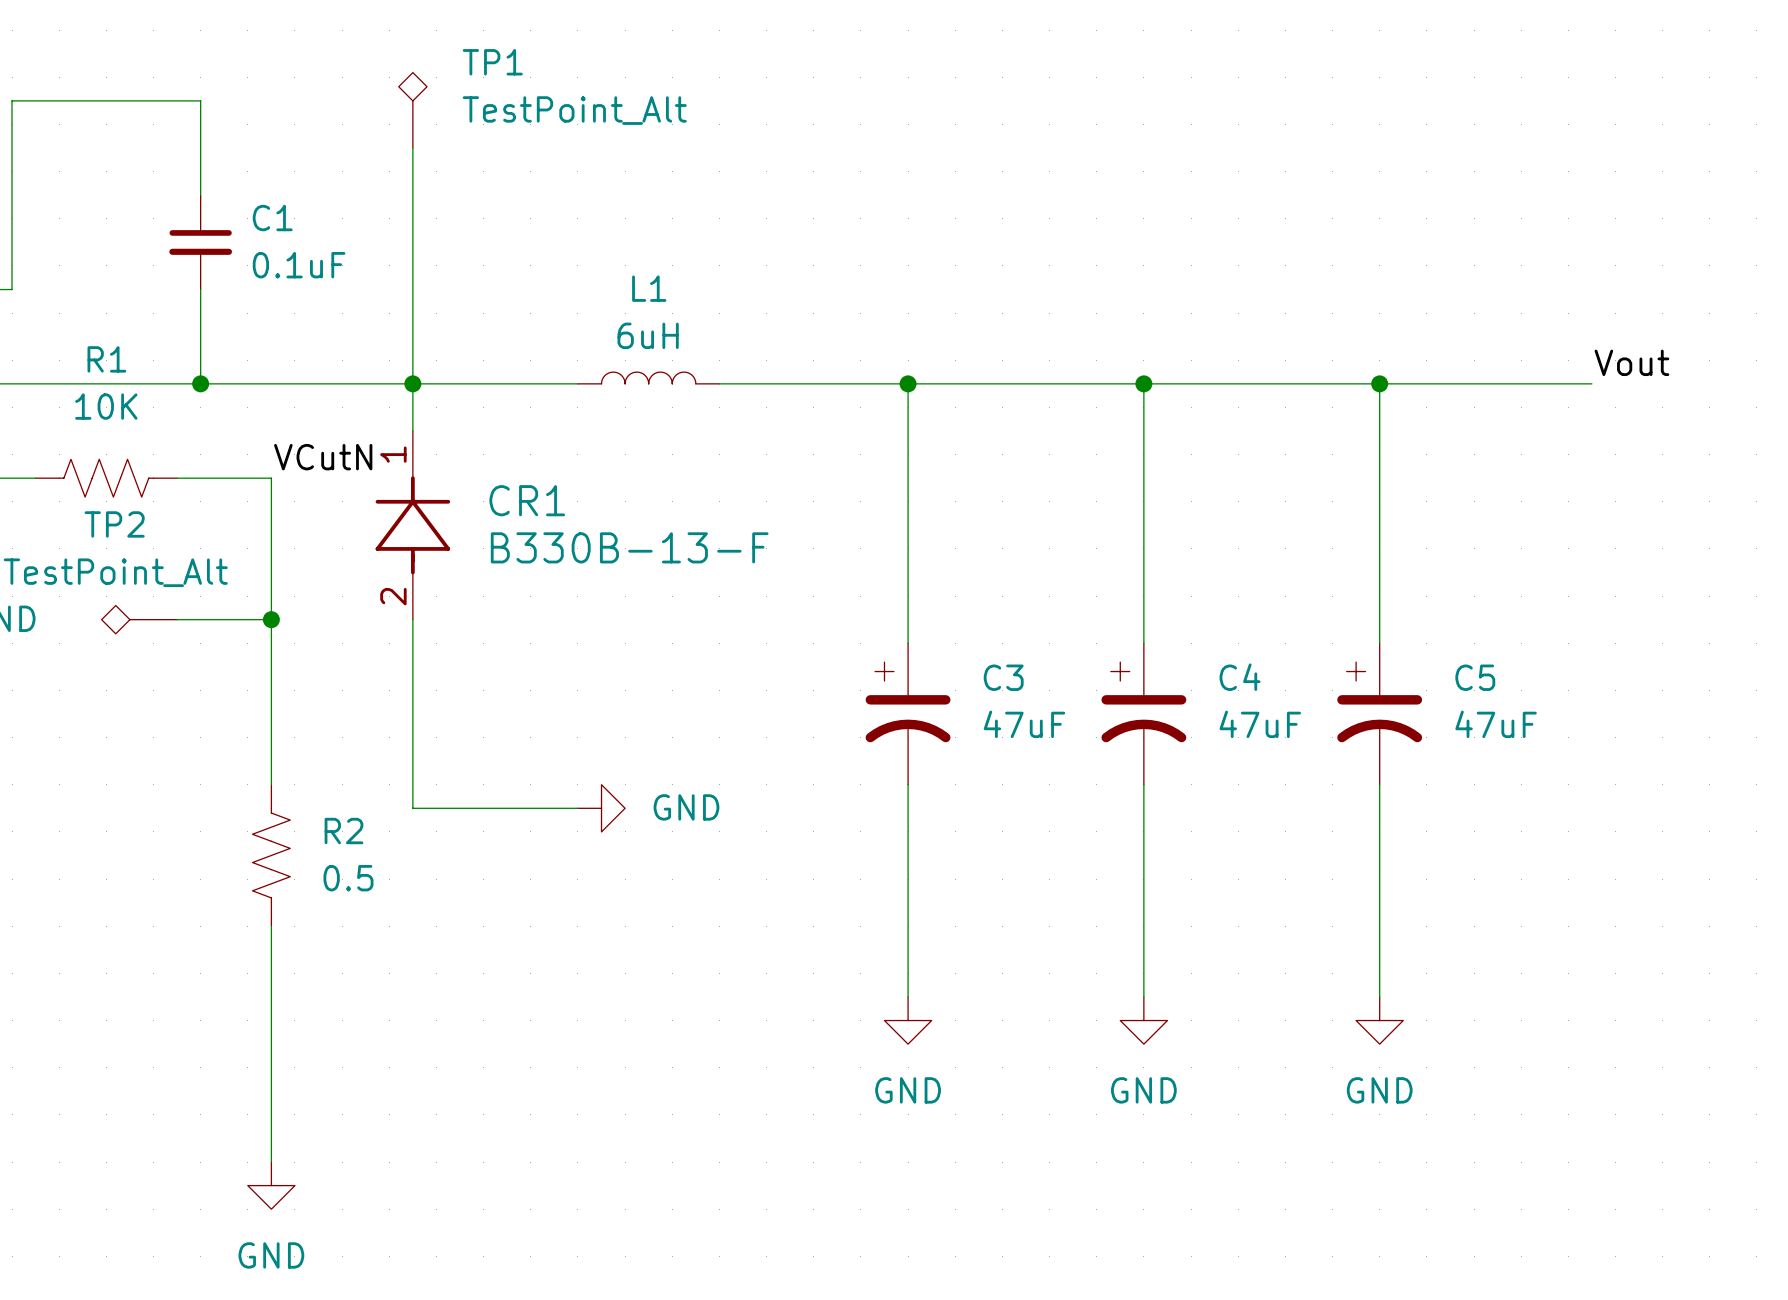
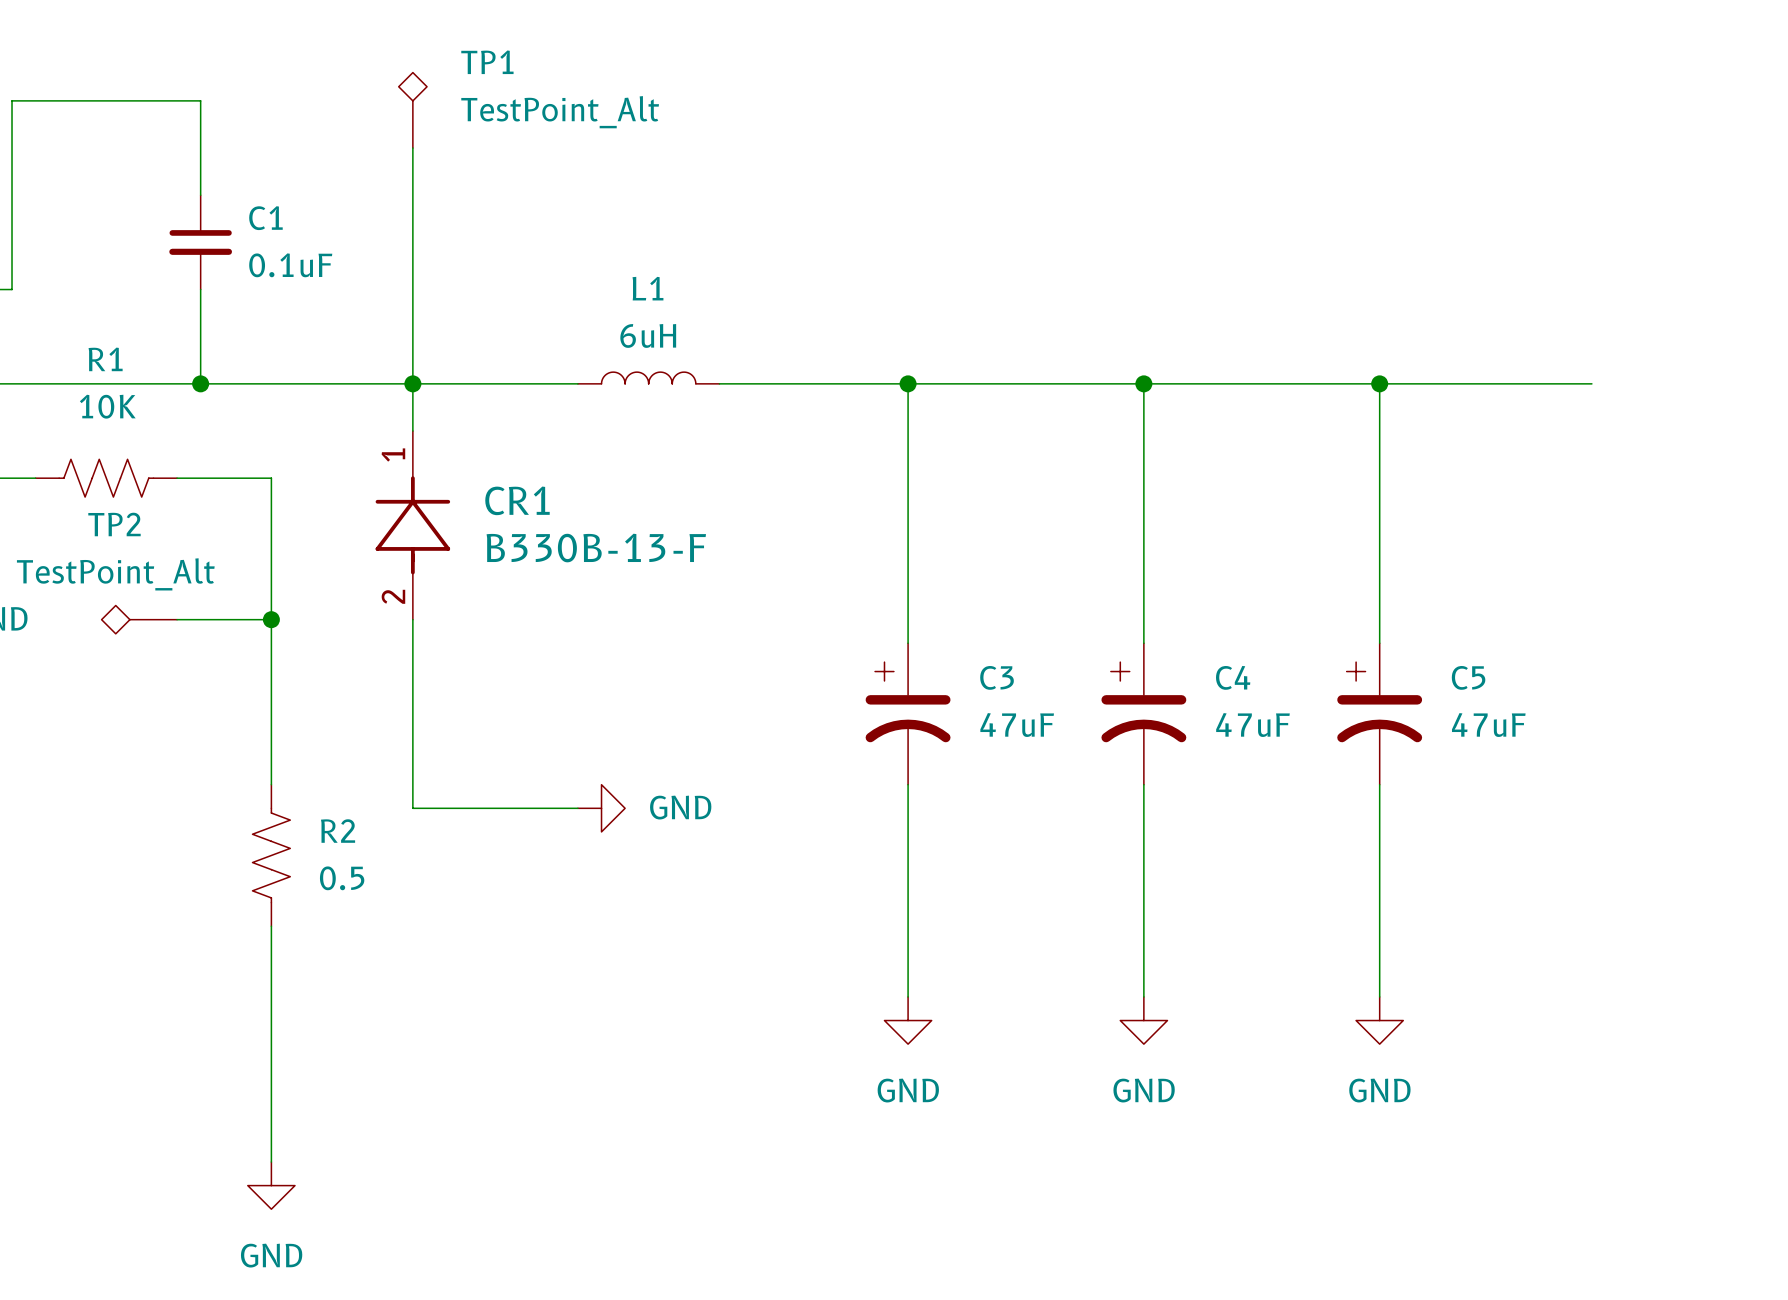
label: Vout (1631, 362) -> none
label: VCutN (323, 457) -> none

